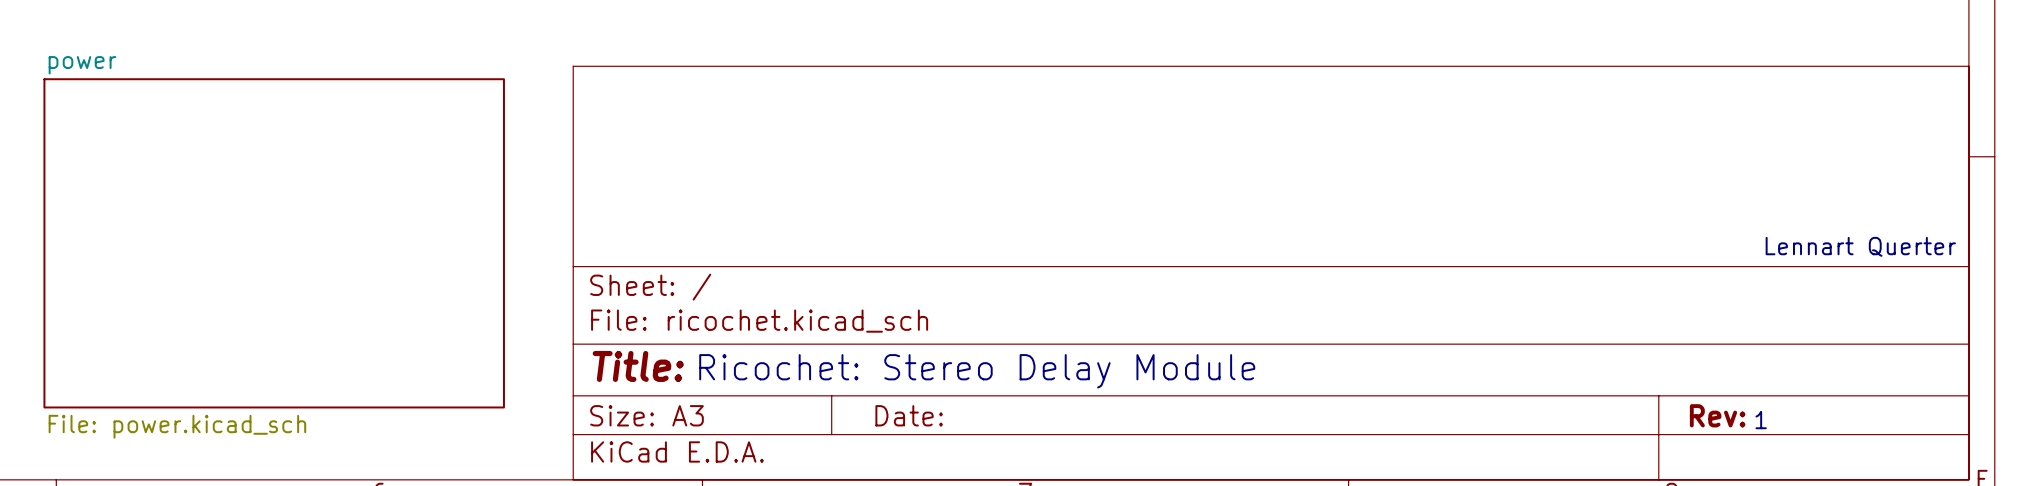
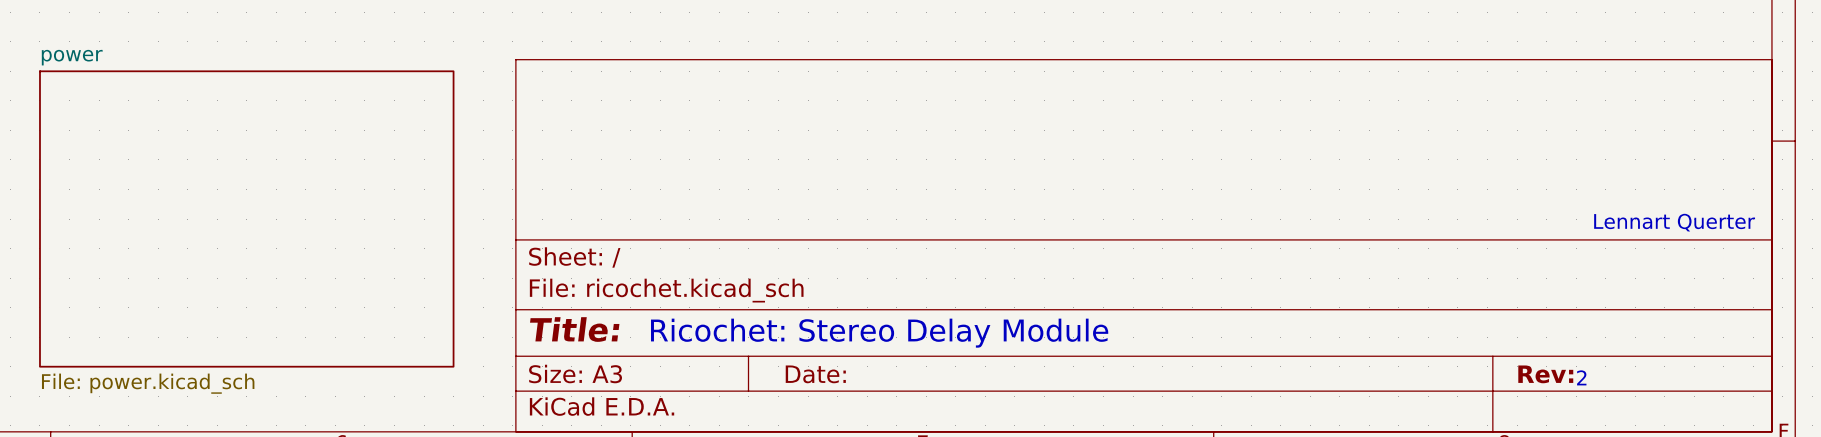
text: 1 (1761, 420) -> 2 (1581, 377)

